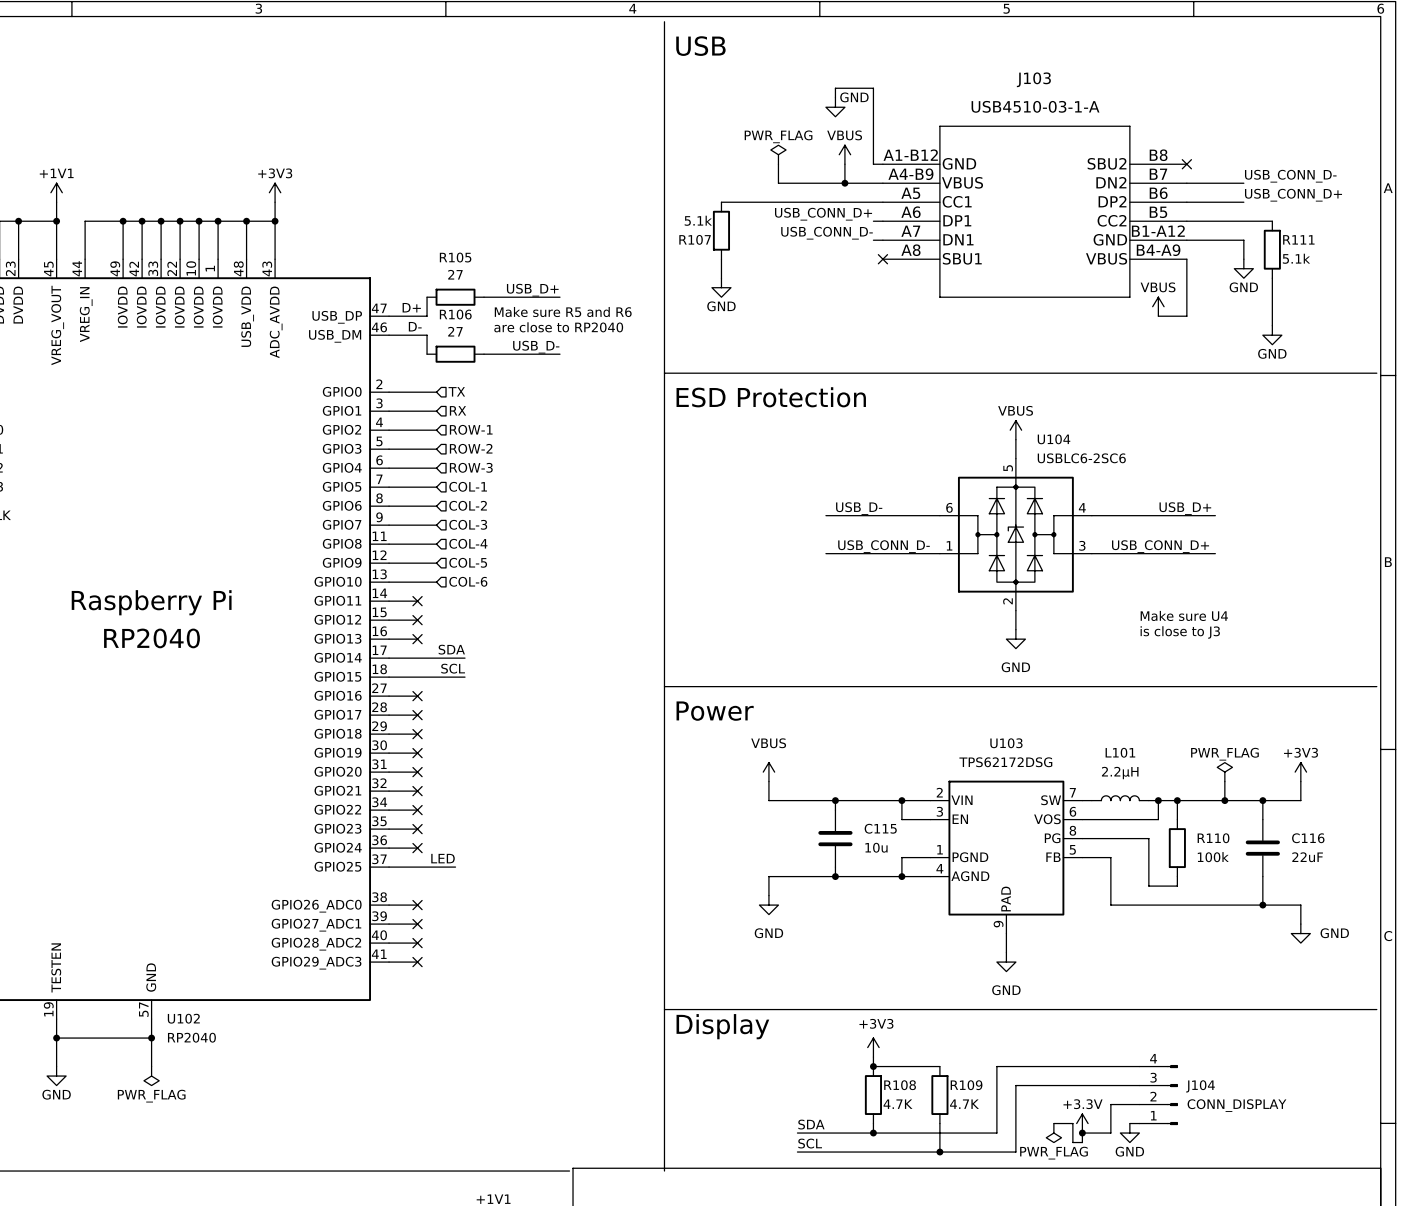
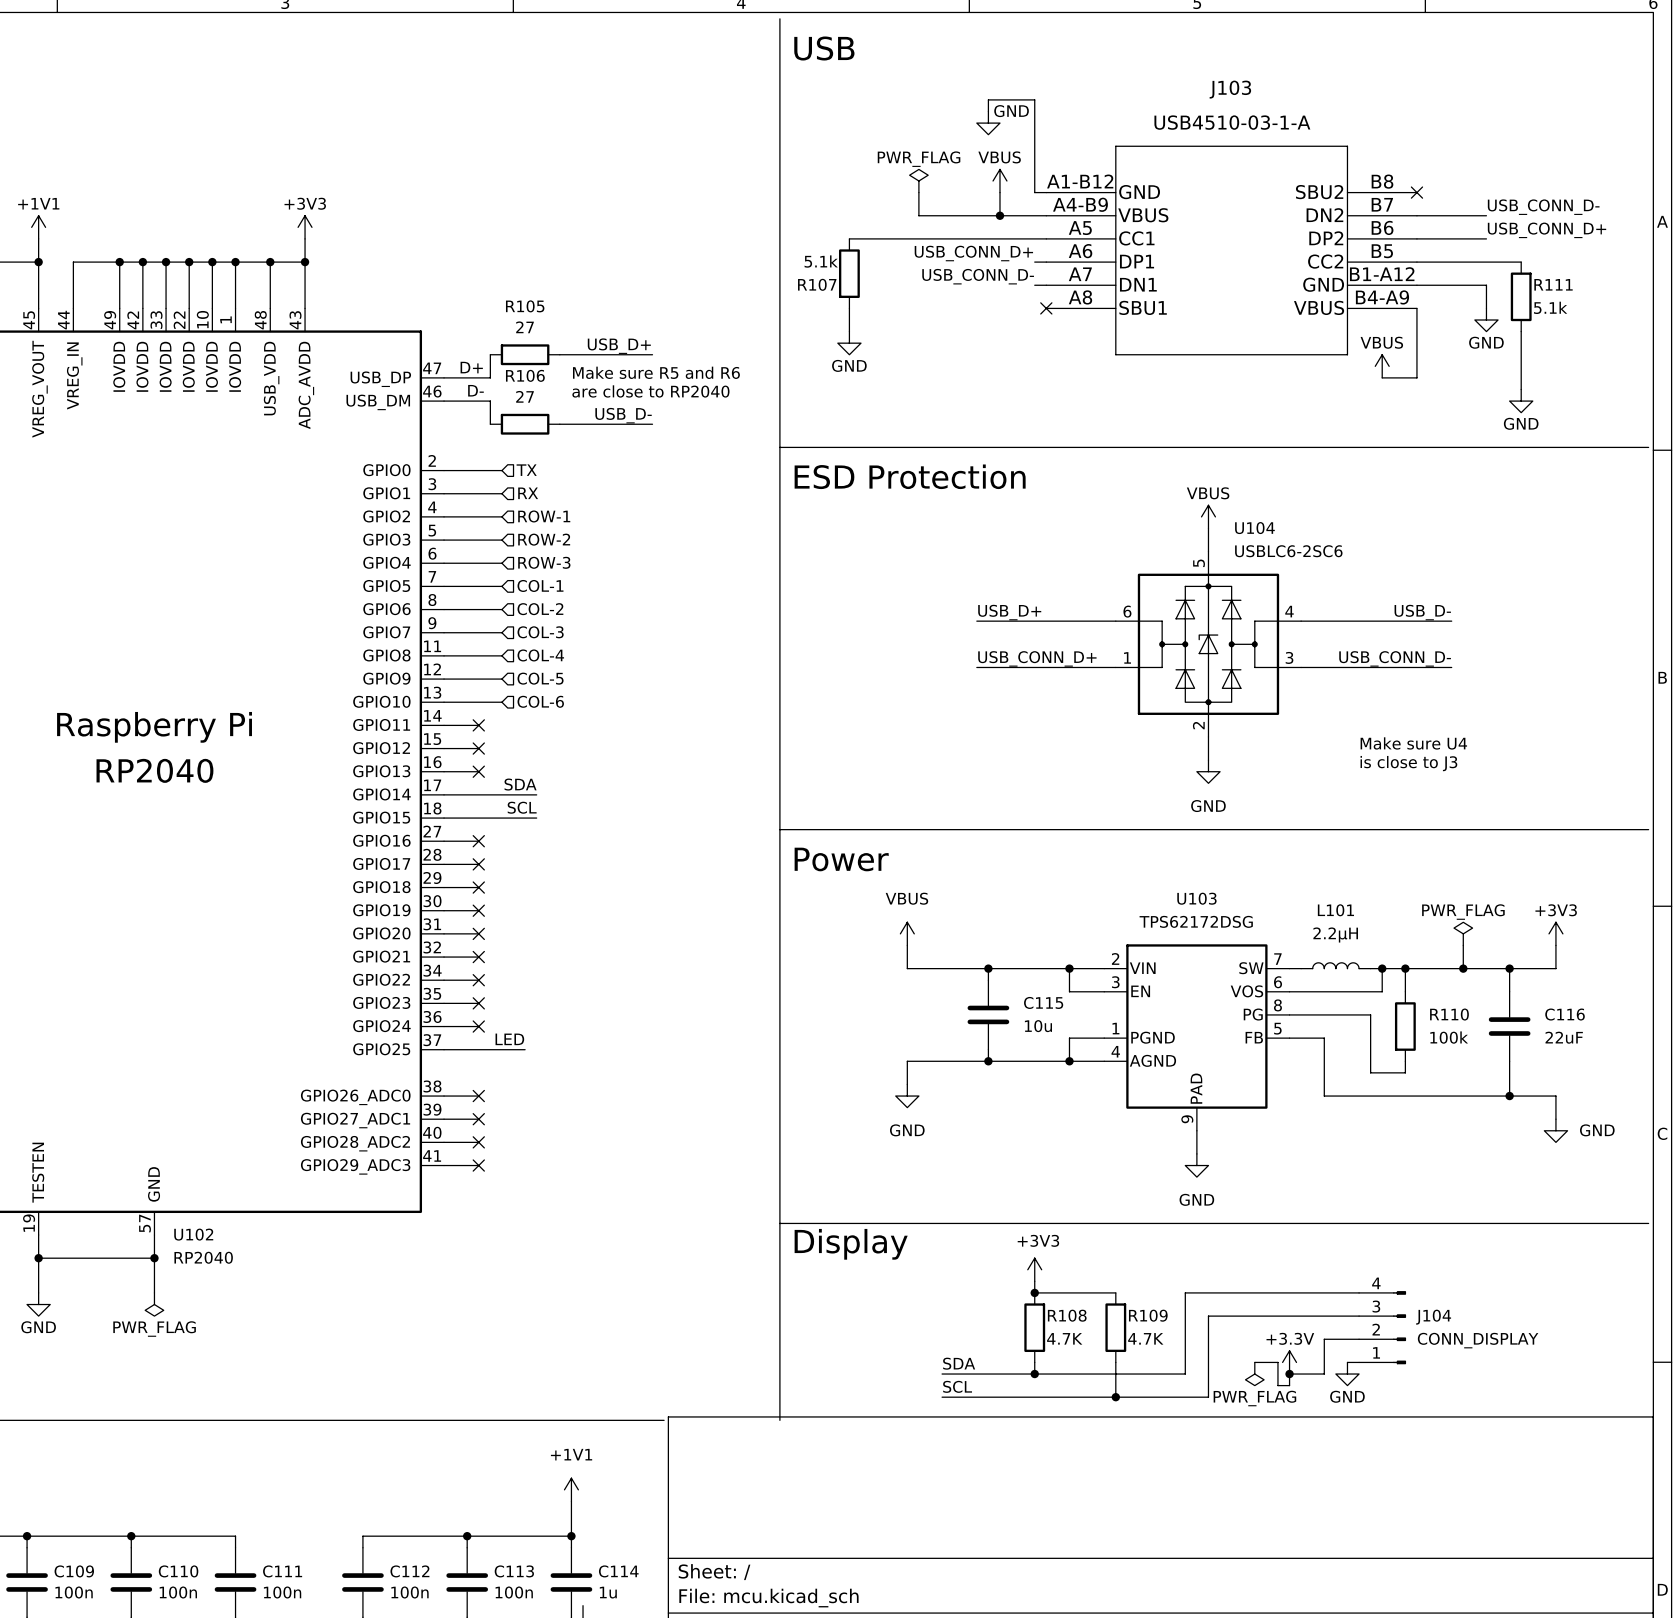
label: USB_D- (859, 508) -> USB_D+ (1009, 612)
label: USB_D+ (1185, 508) -> USB_D- (1422, 612)
label: USB_CONN_D- (883, 546) -> USB_CONN_D+ (1037, 658)
label: USB_CONN_D+ (1160, 546) -> USB_CONN_D- (1395, 658)

